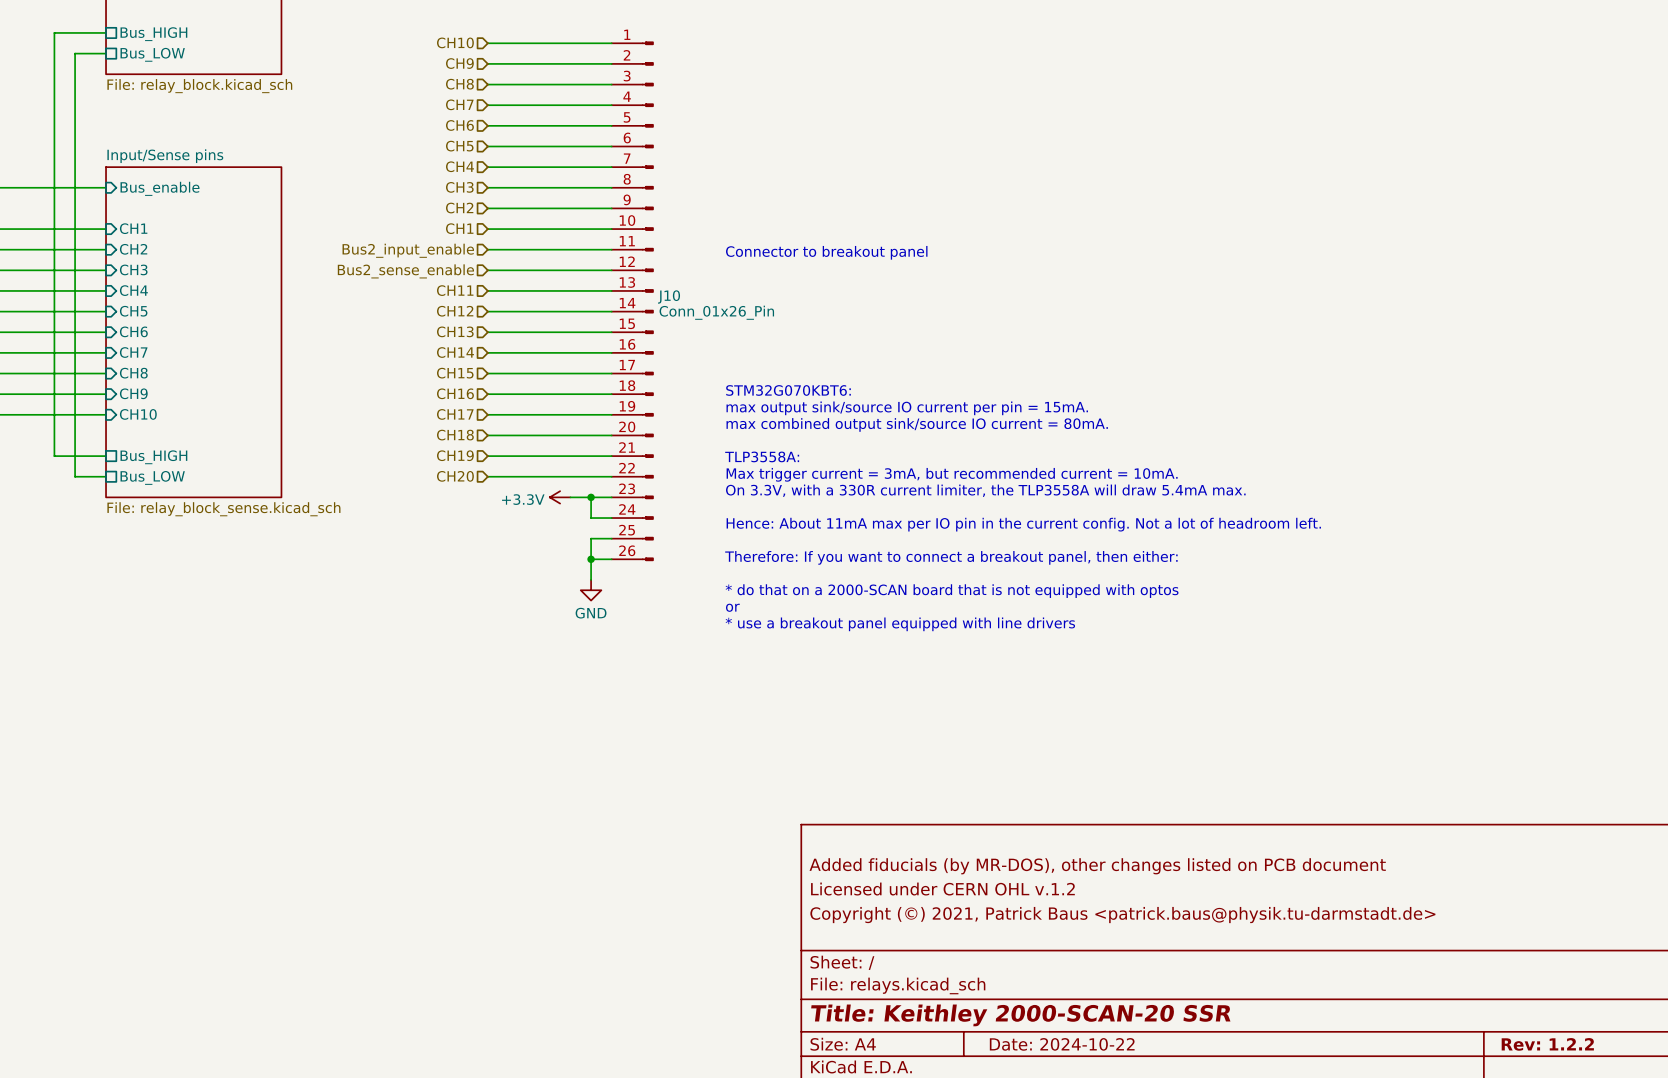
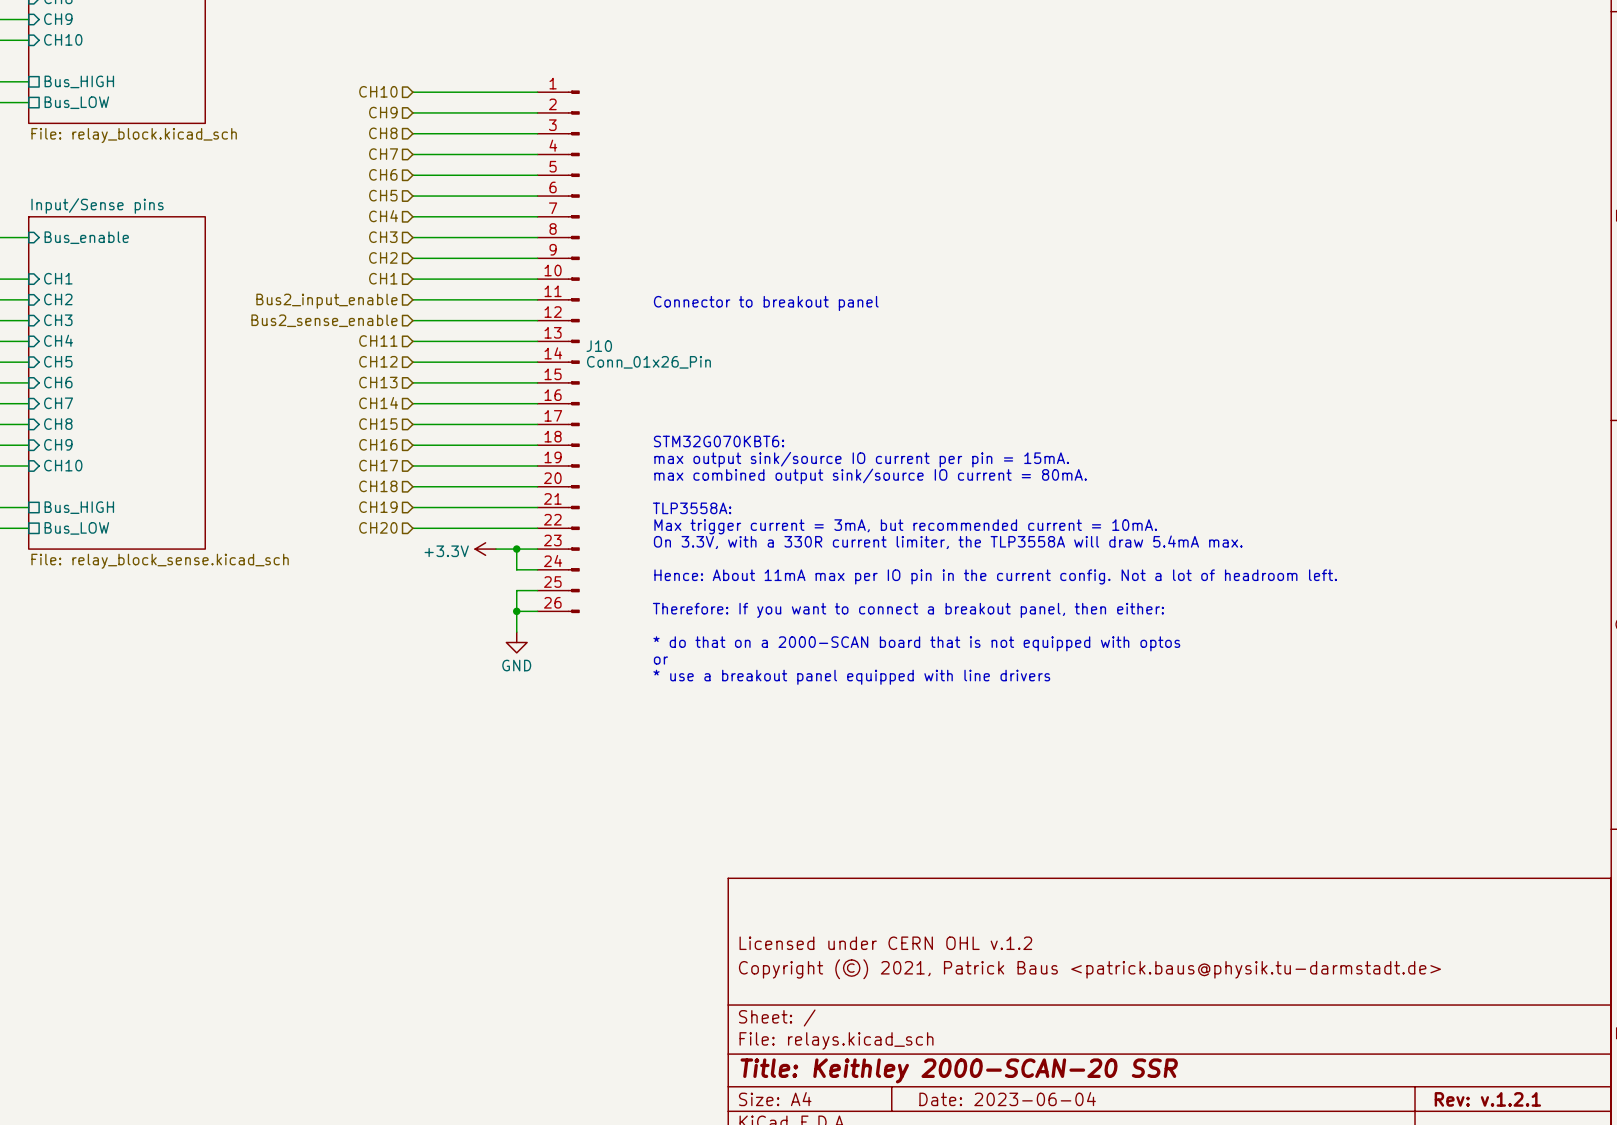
title block: Added fiducials (by MR-DOS), other changes listed on PCB document (1097, 866) -> none
title block: Date: 2024-10-22 (1062, 1044) -> Date: 2023-06-04 (1007, 1099)
title block: Rev: 1.2.2 (1547, 1044) -> Rev: v.1.2.1 (1487, 1099)

